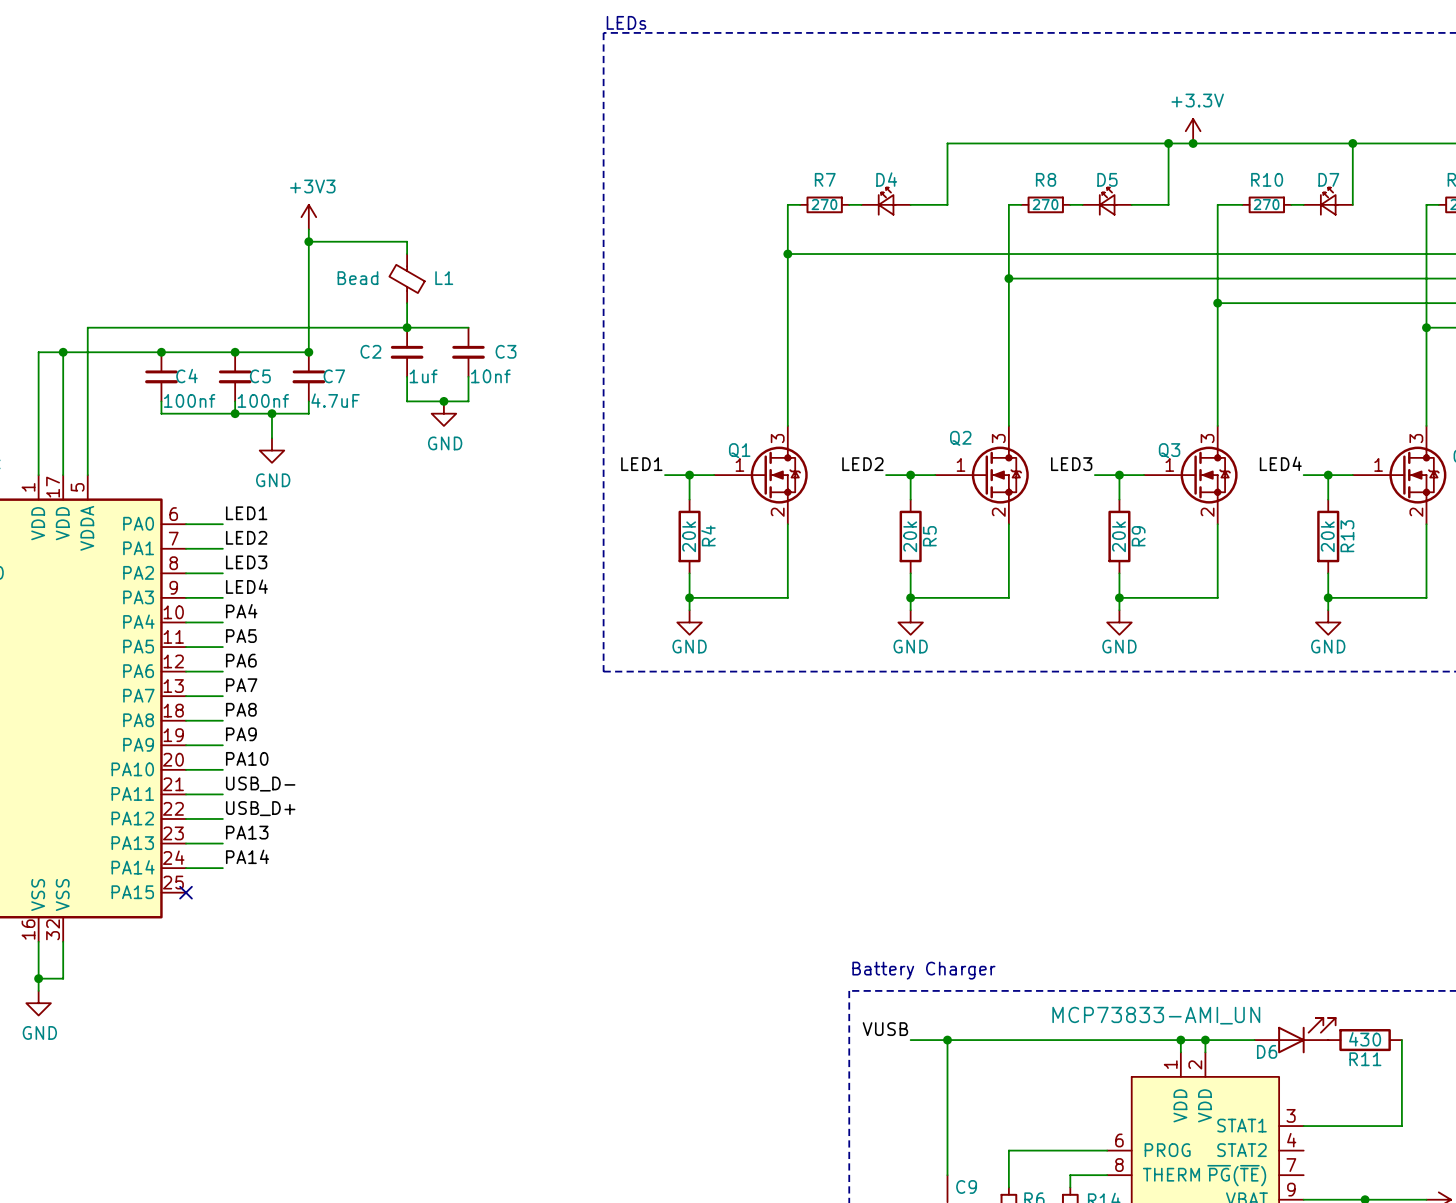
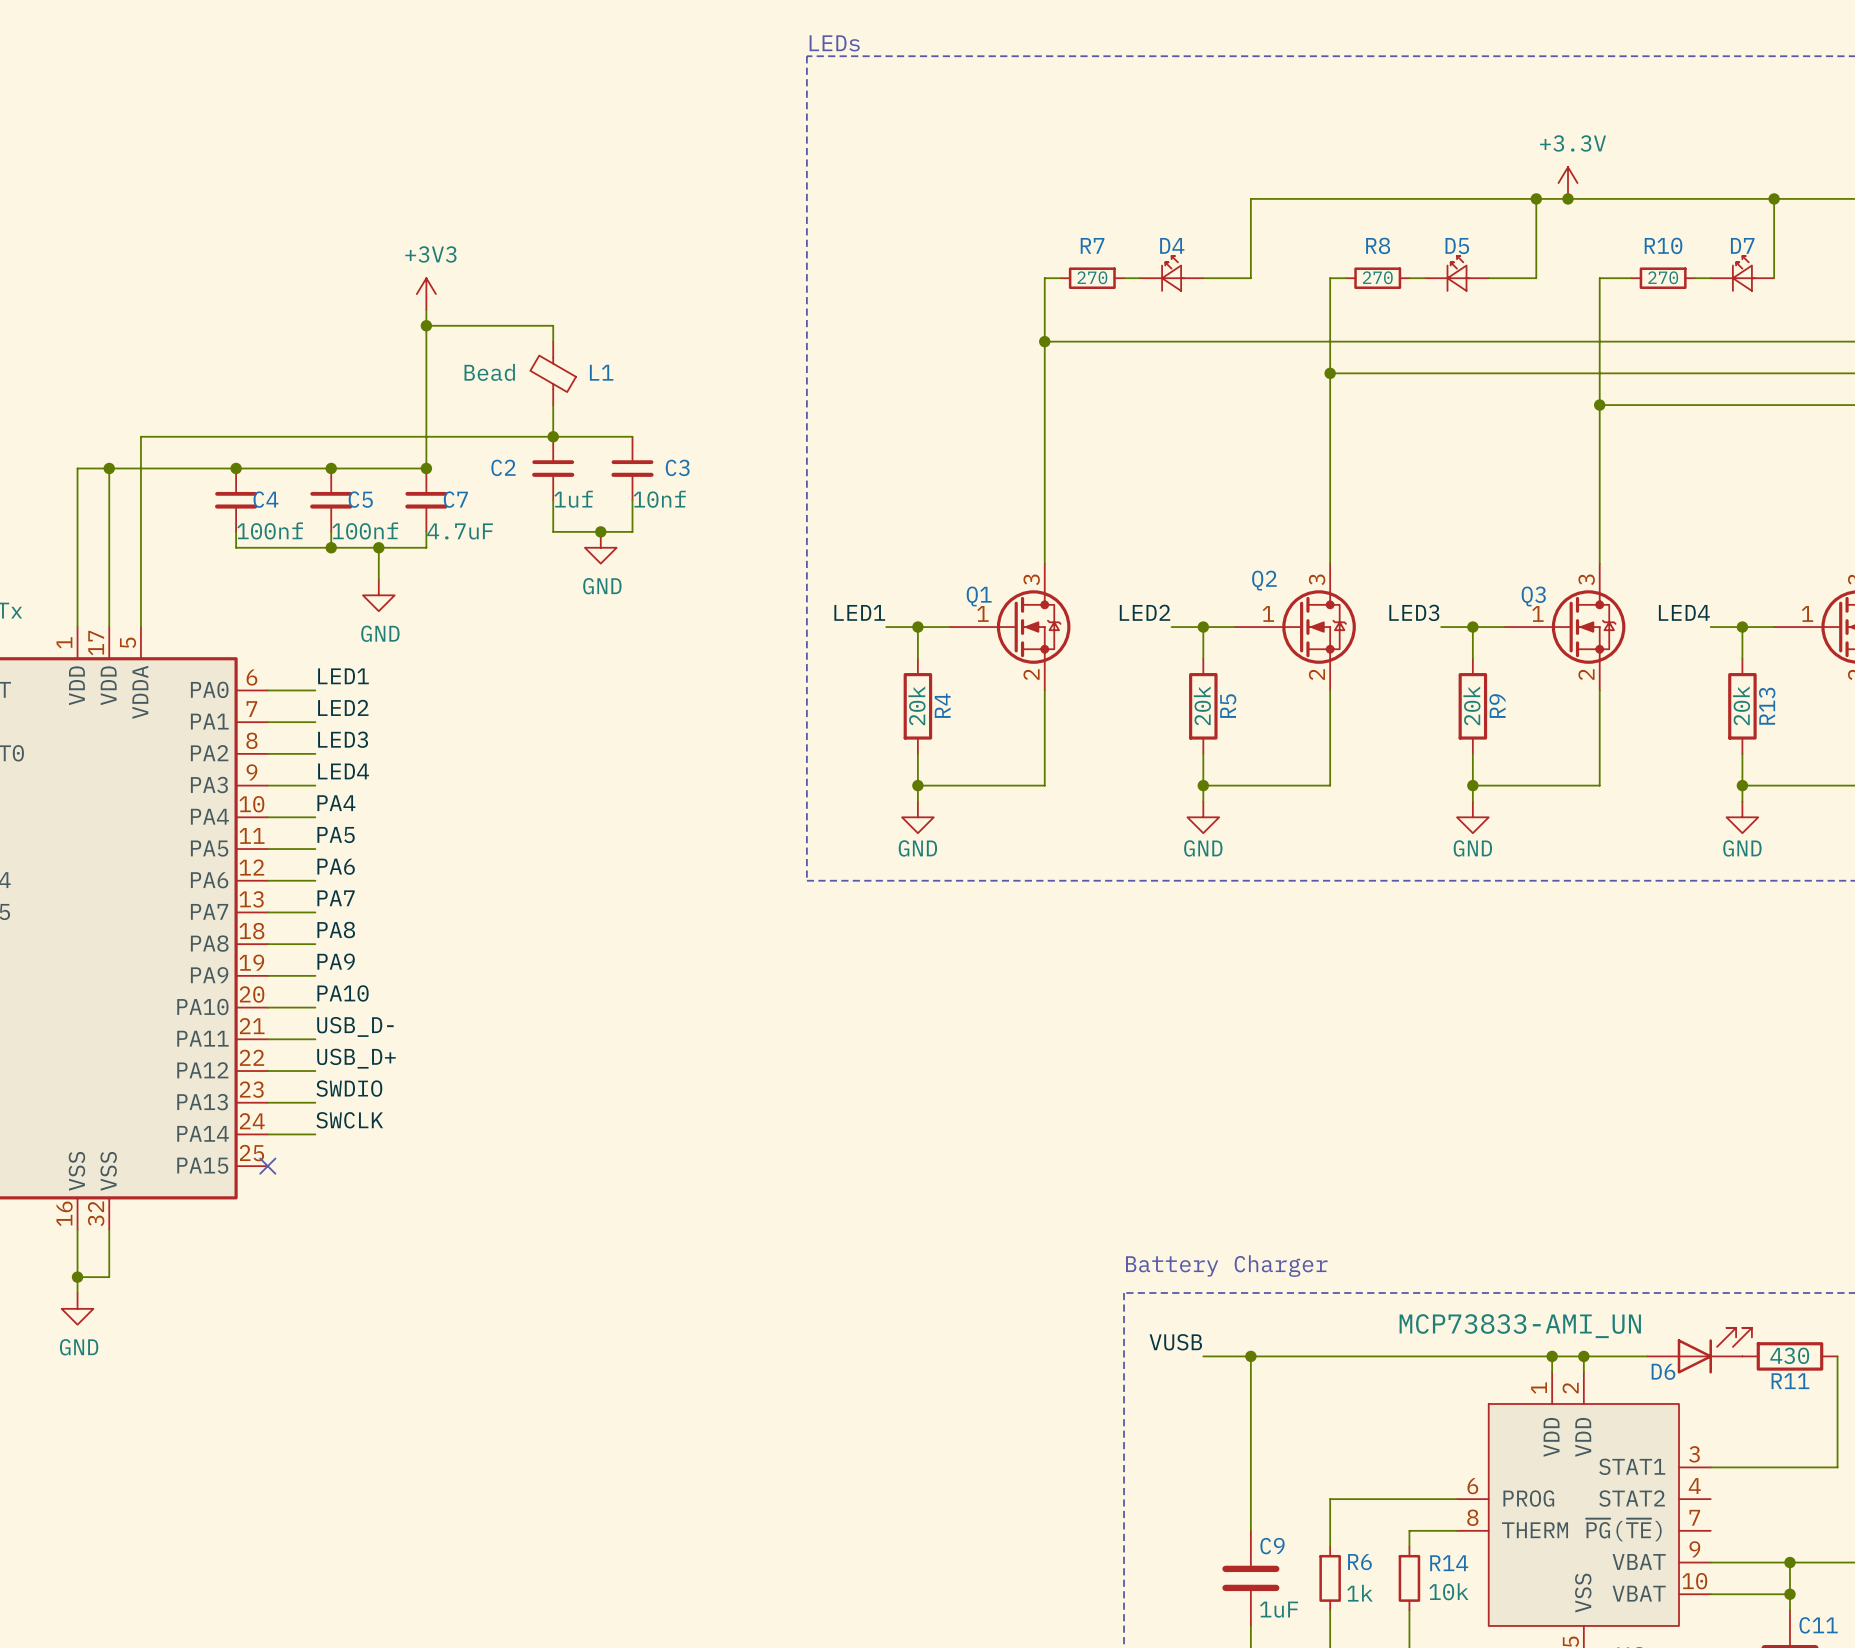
label: PA13 (247, 832) -> SWDIO (349, 1088)
label: PA14 (247, 856) -> SWCLK (349, 1120)

